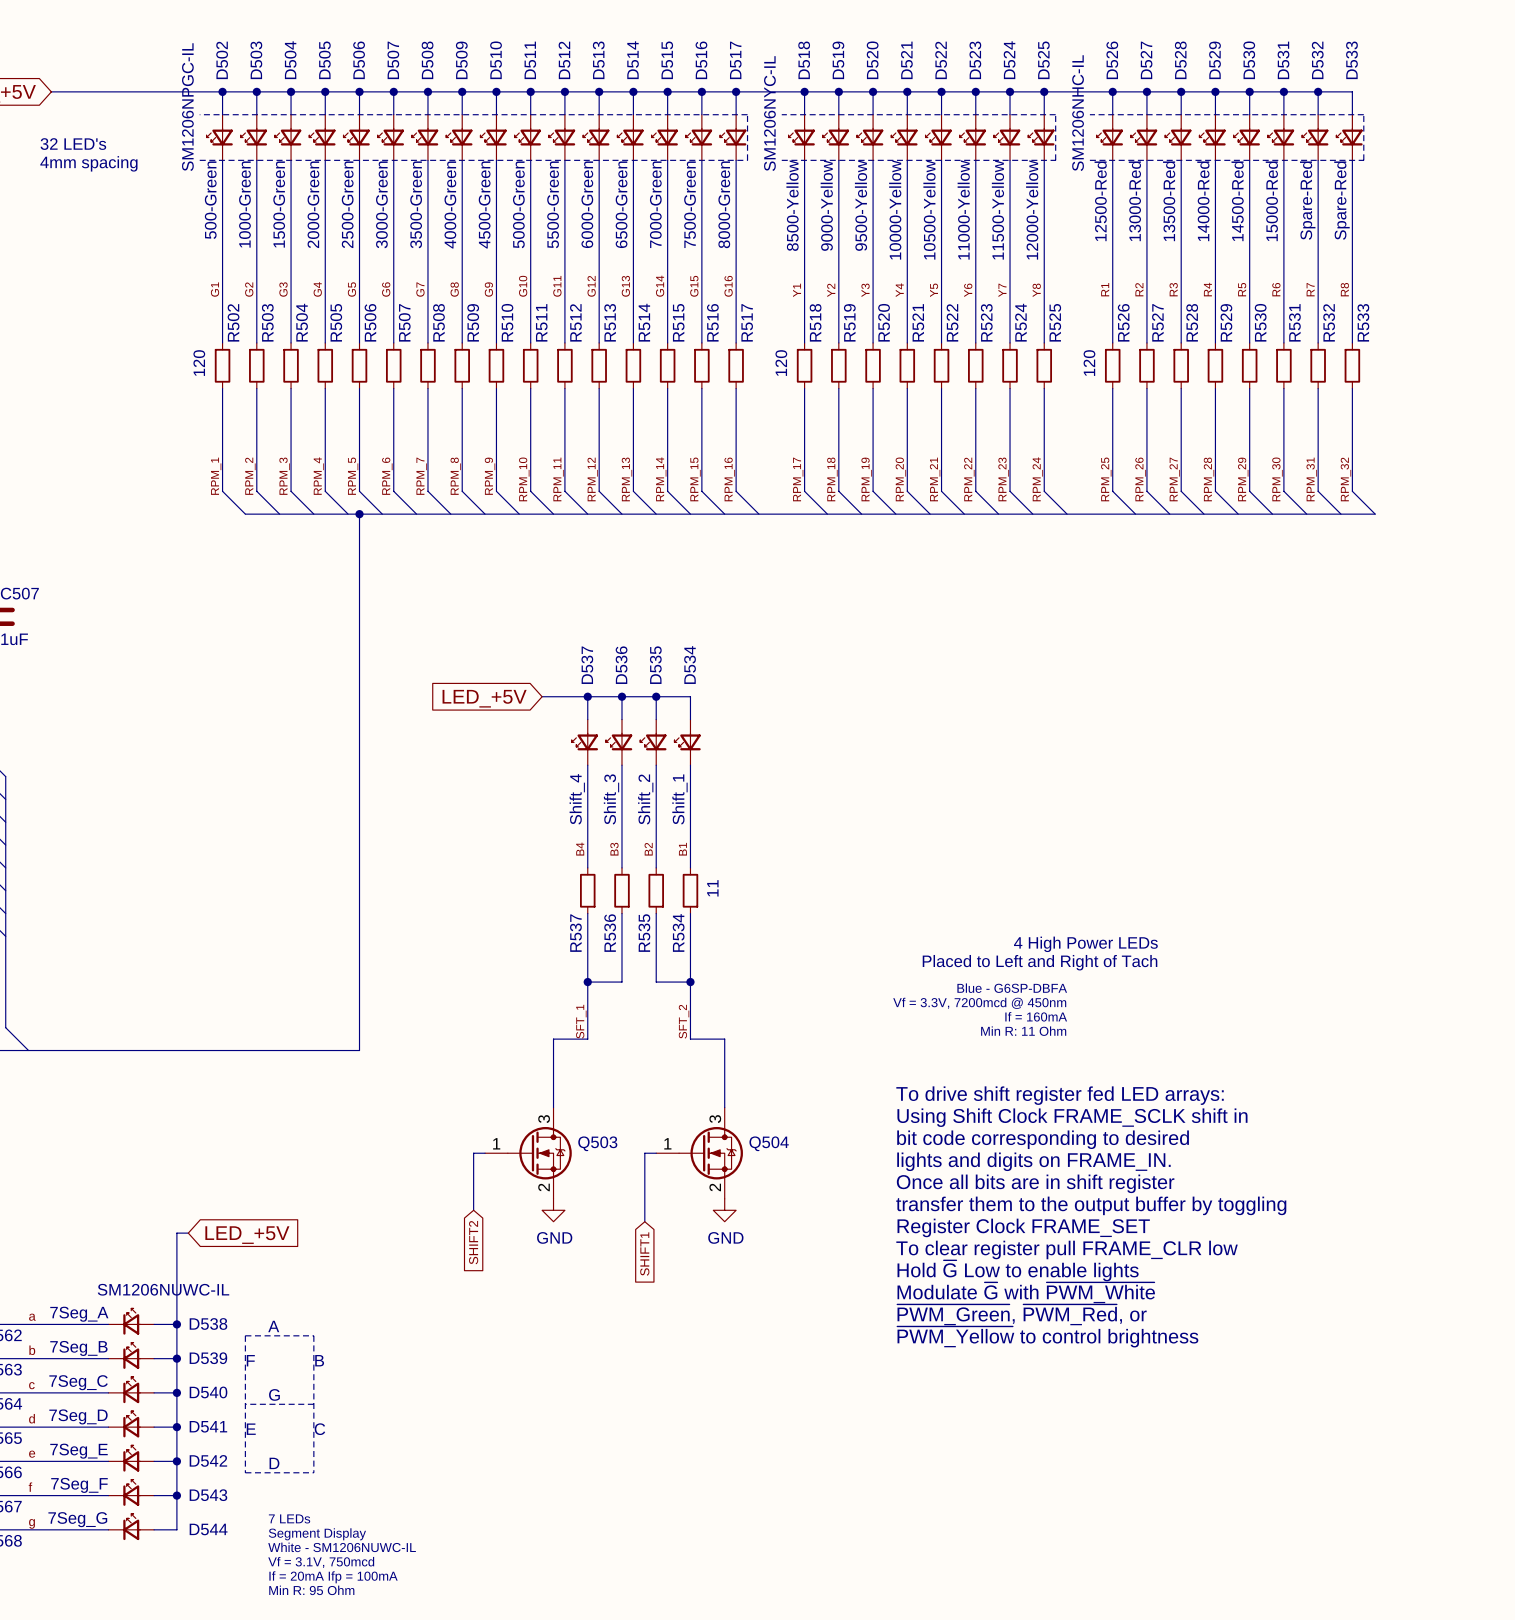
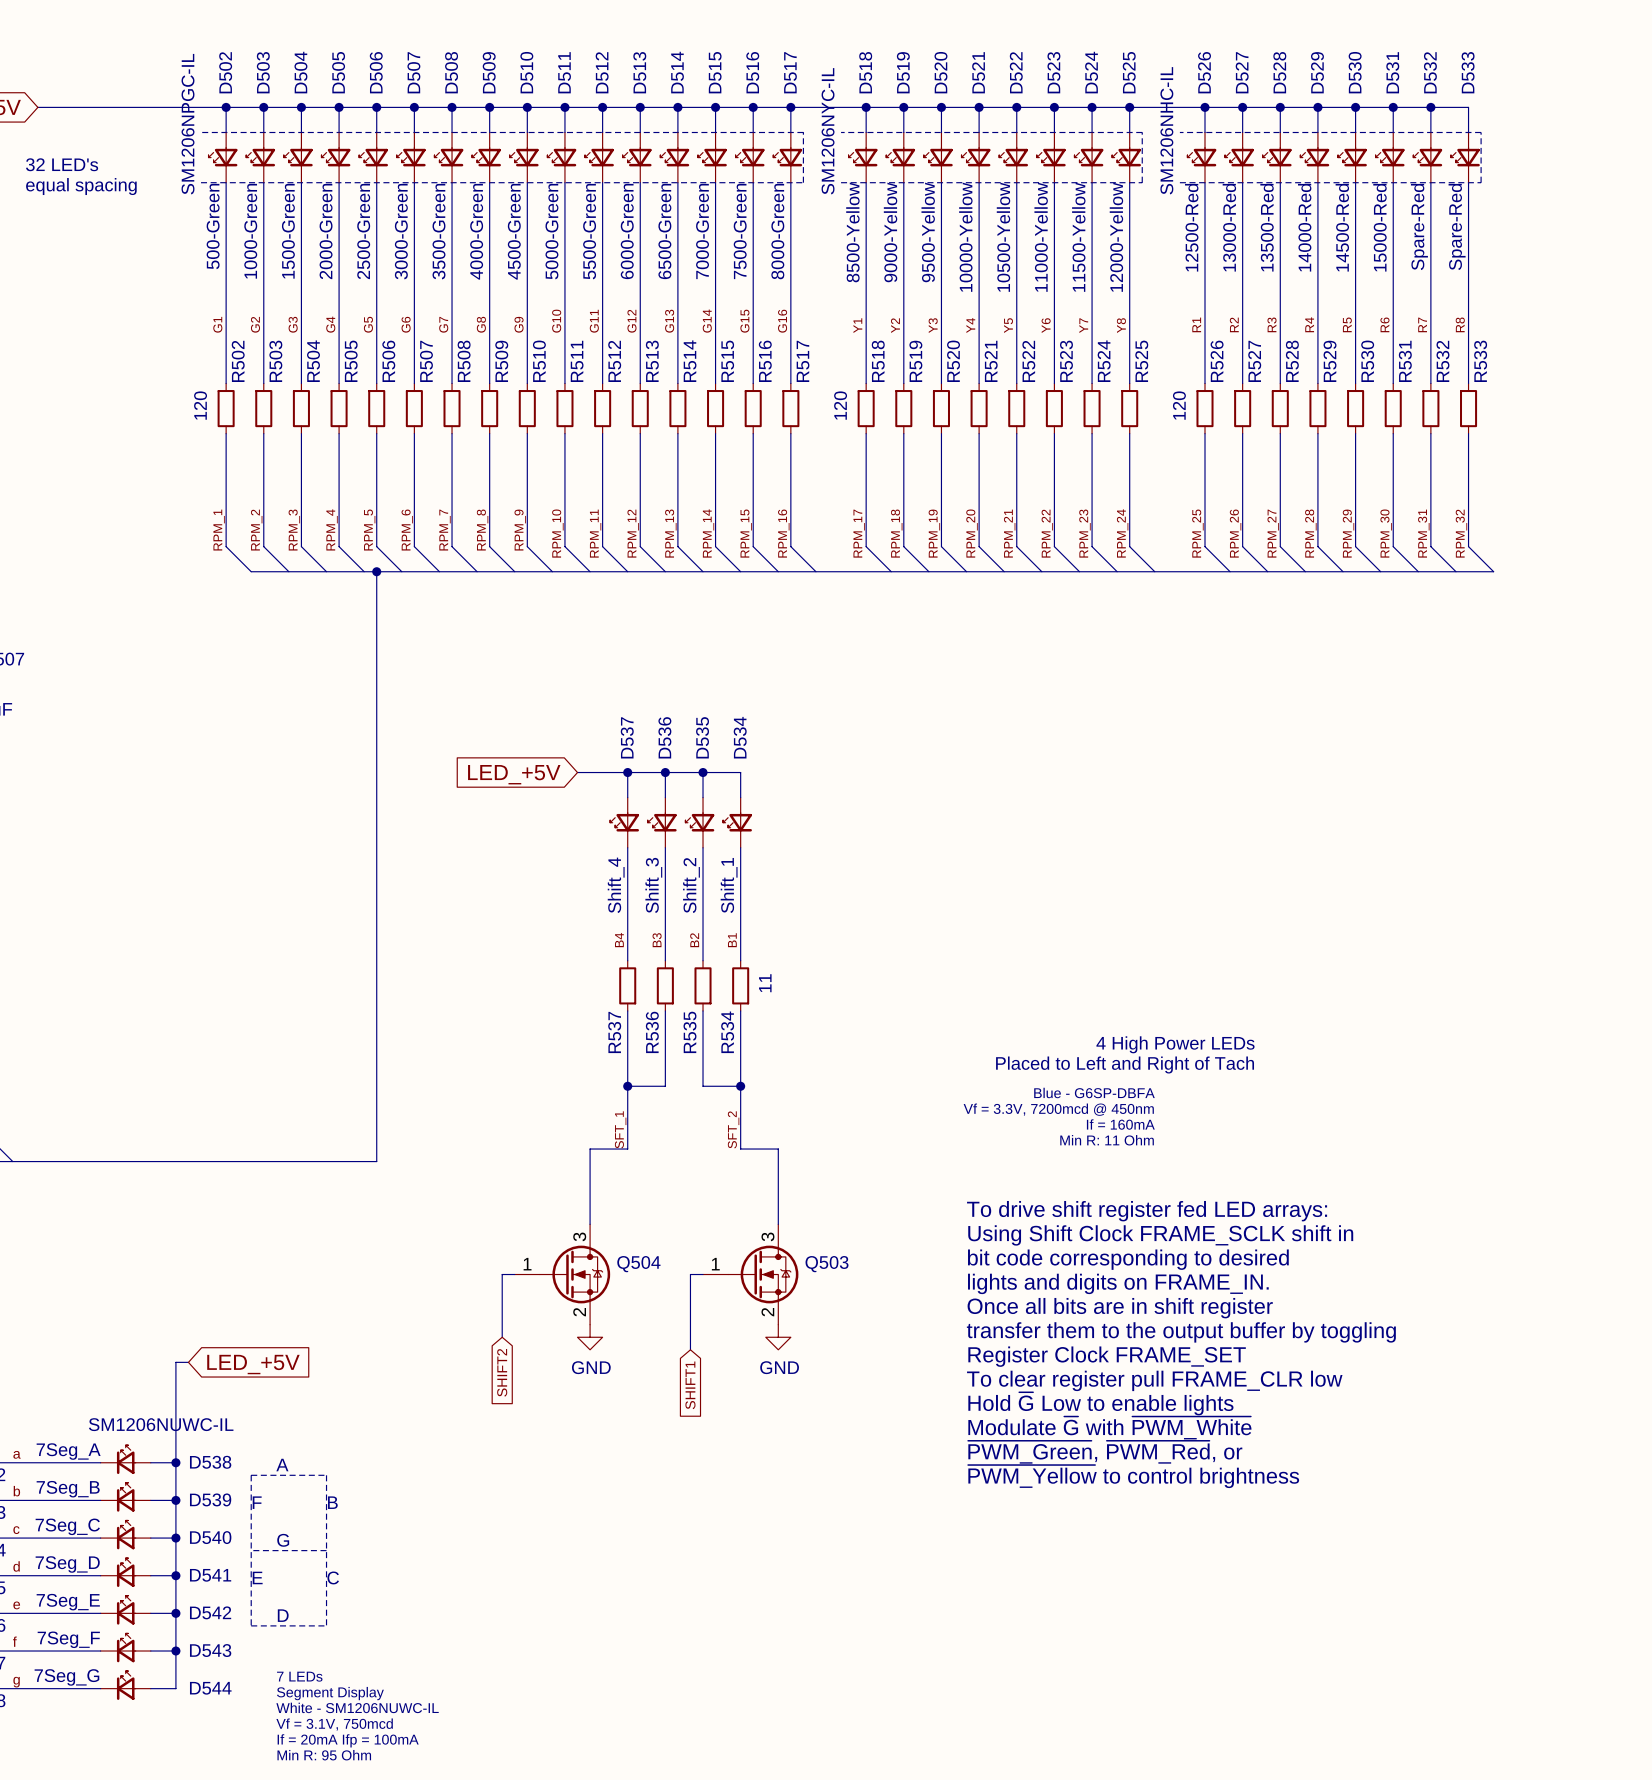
text: 4mm spacing (88, 163) -> equal spacing (81, 186)
Q503 name: Q503 (597, 1143) -> Q504 (638, 1264)
Q504 name: Q504 (769, 1143) -> Q503 (827, 1264)

